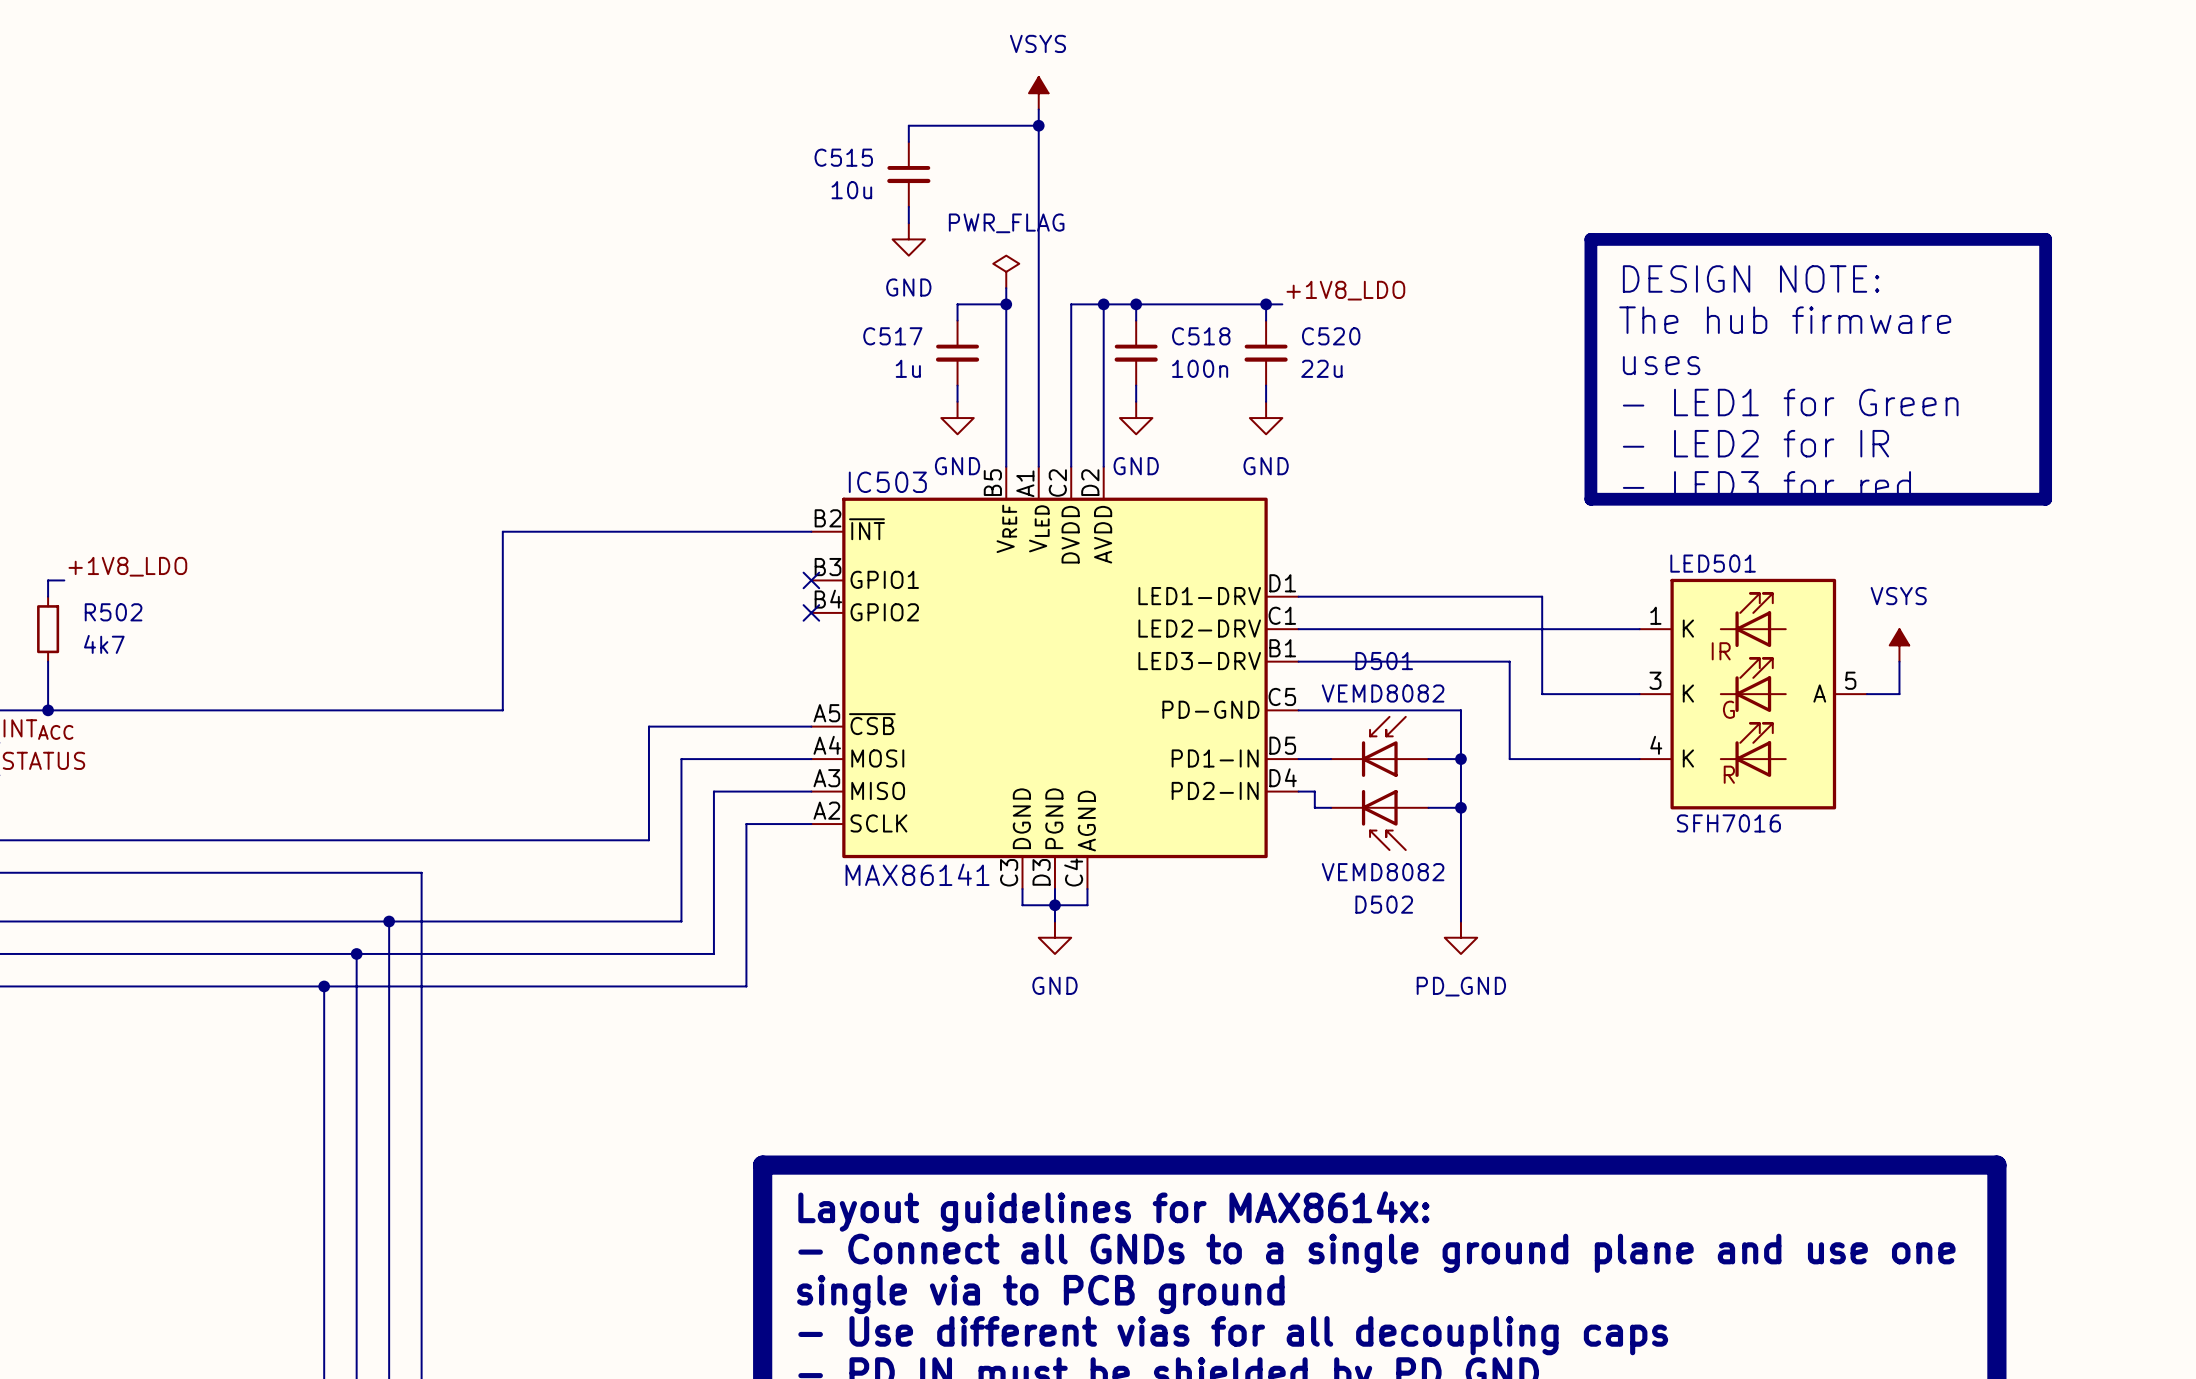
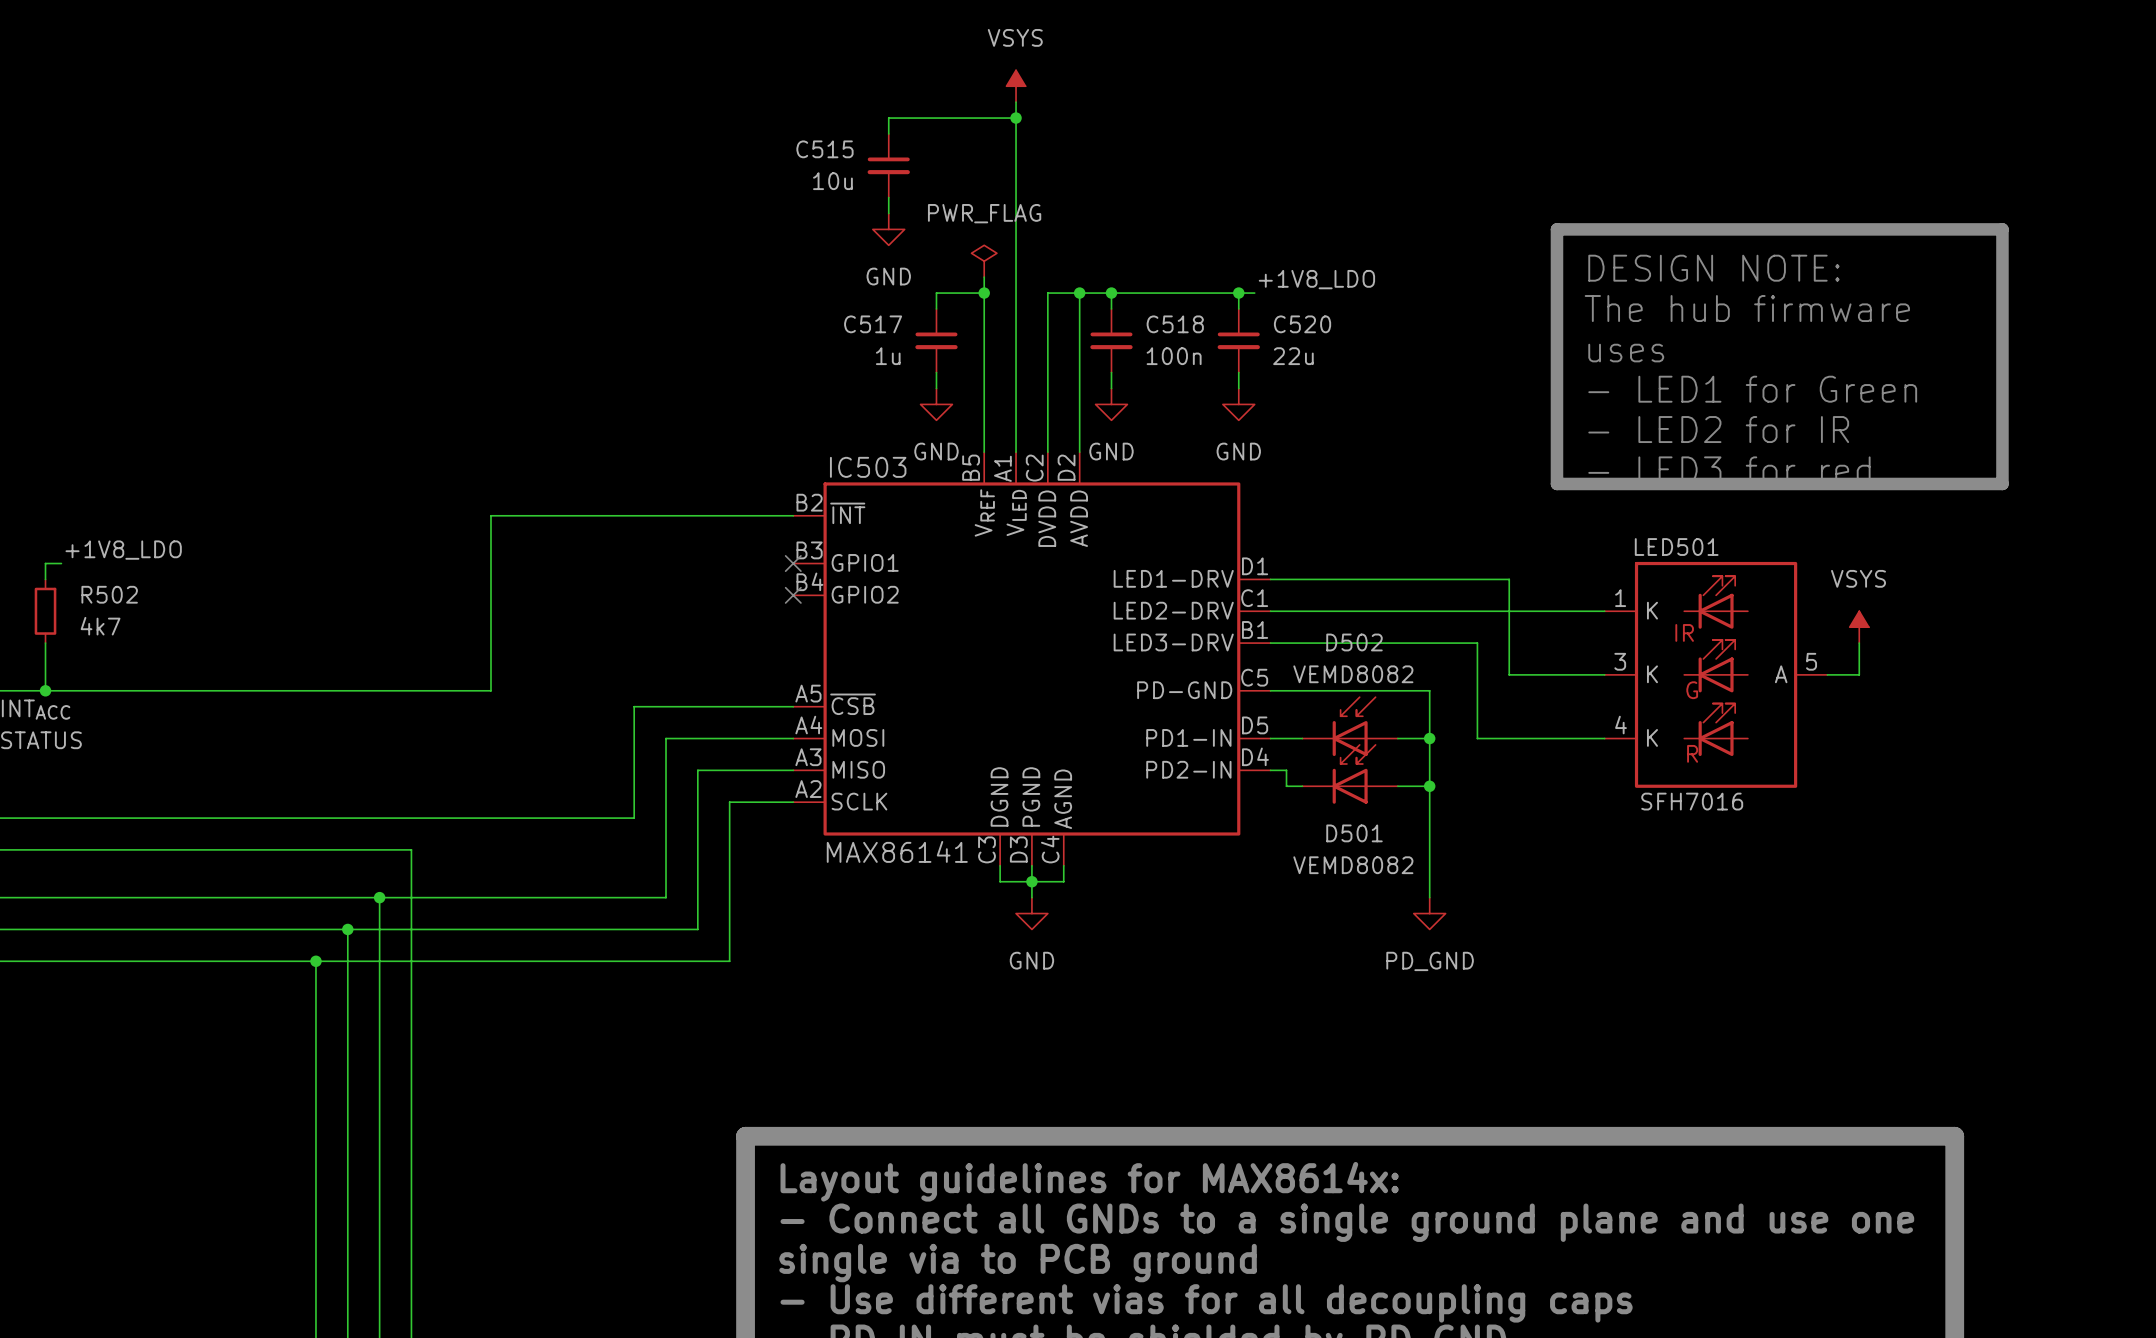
D501 name: D501 (1384, 661) -> D502 (1354, 642)
D501: none -> VEMD8082 (1350, 774)
D502: VEMD8082 (1379, 819) -> none

